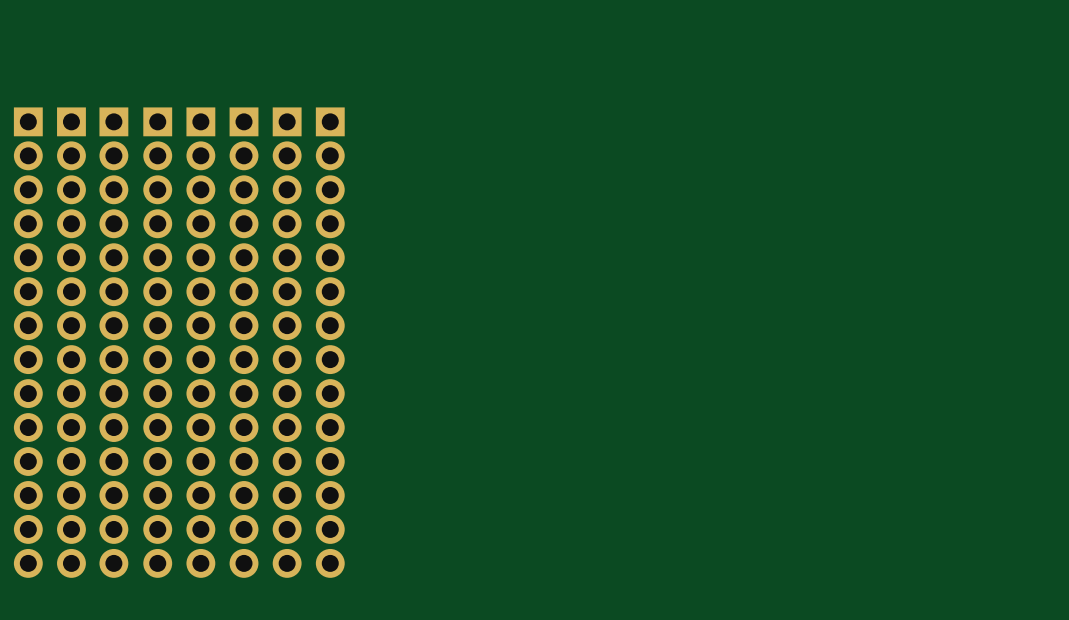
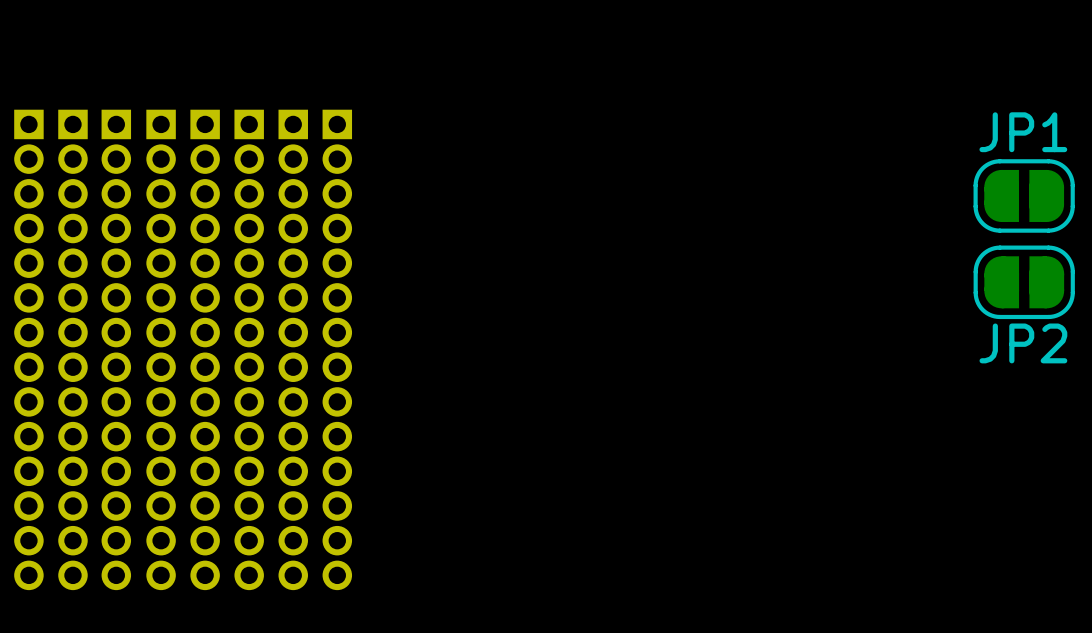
JP1: none -> (1024, 195)
JP2: none -> (1024, 282)

